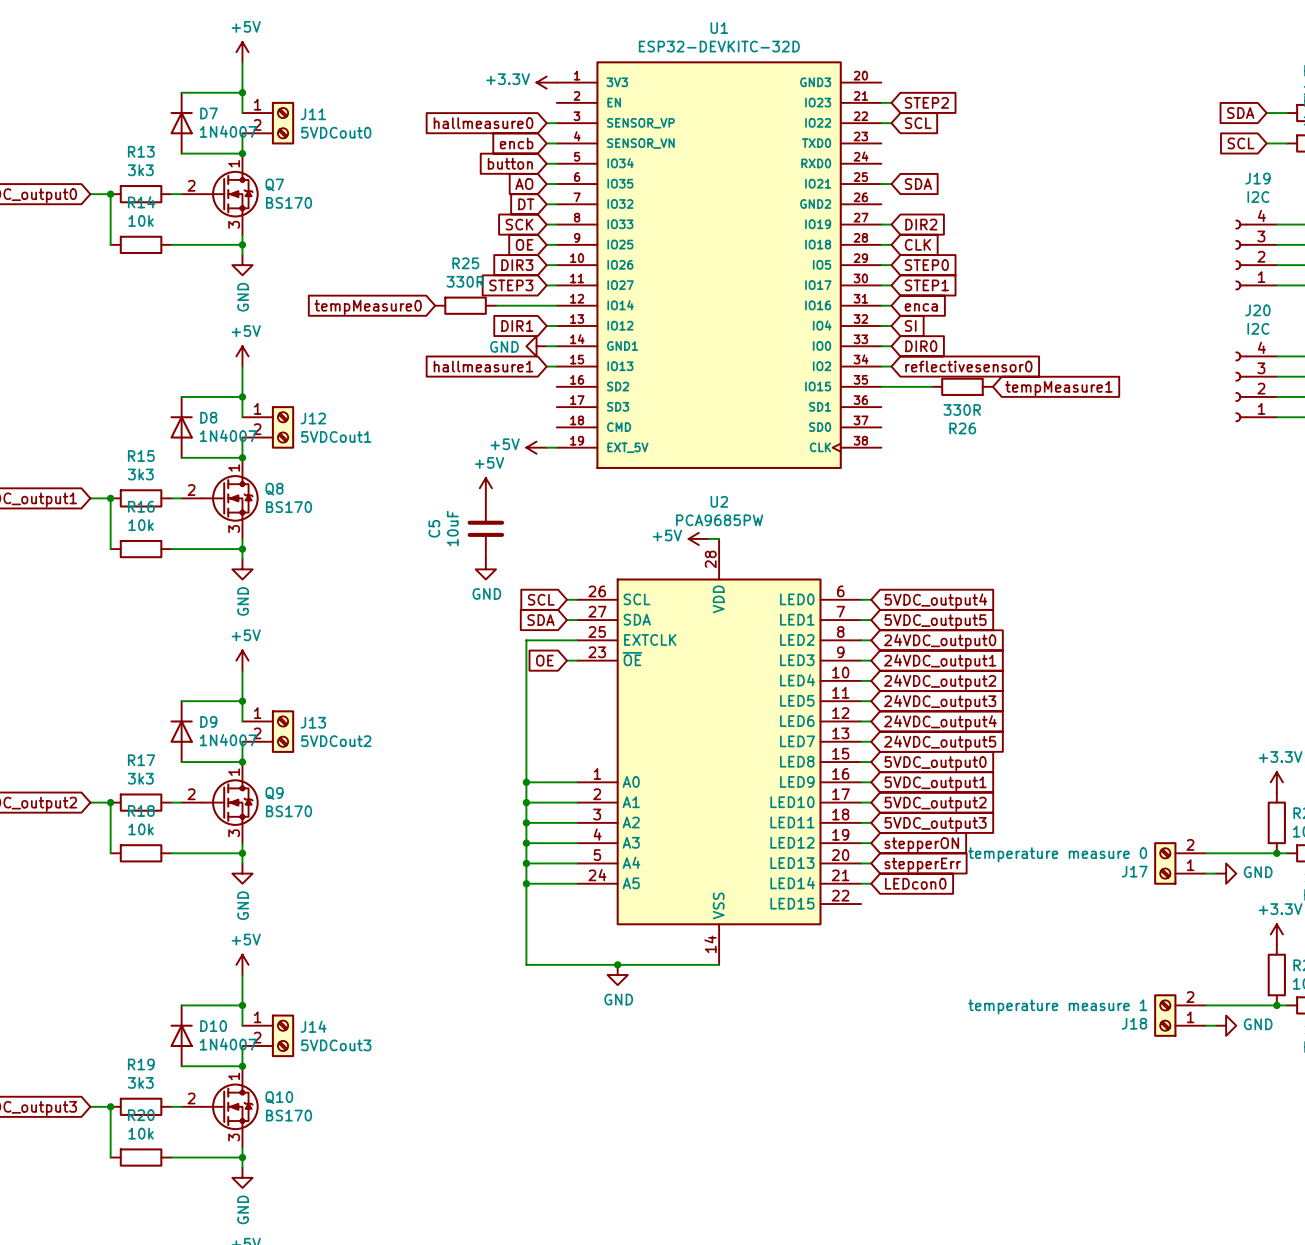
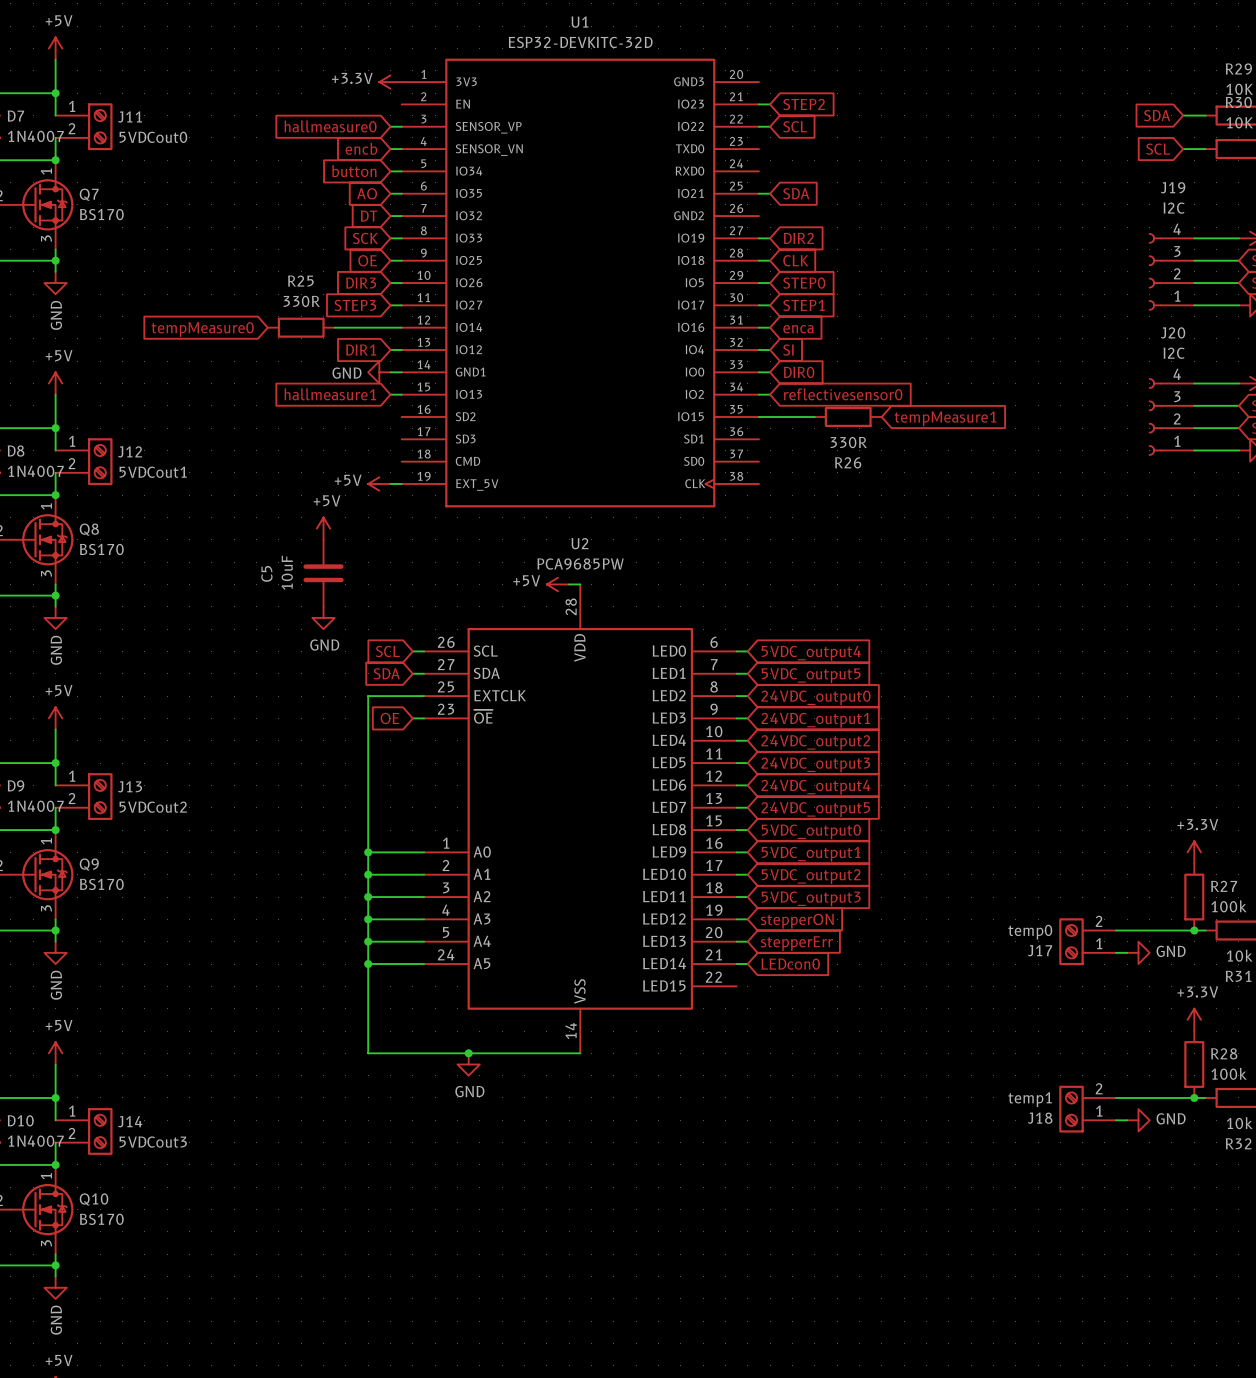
J17 value: temperature measure 0 (1057, 854) -> temp0 (1030, 932)
J18 value: temperature measure 1 (1057, 1006) -> temp1 (1030, 1099)

